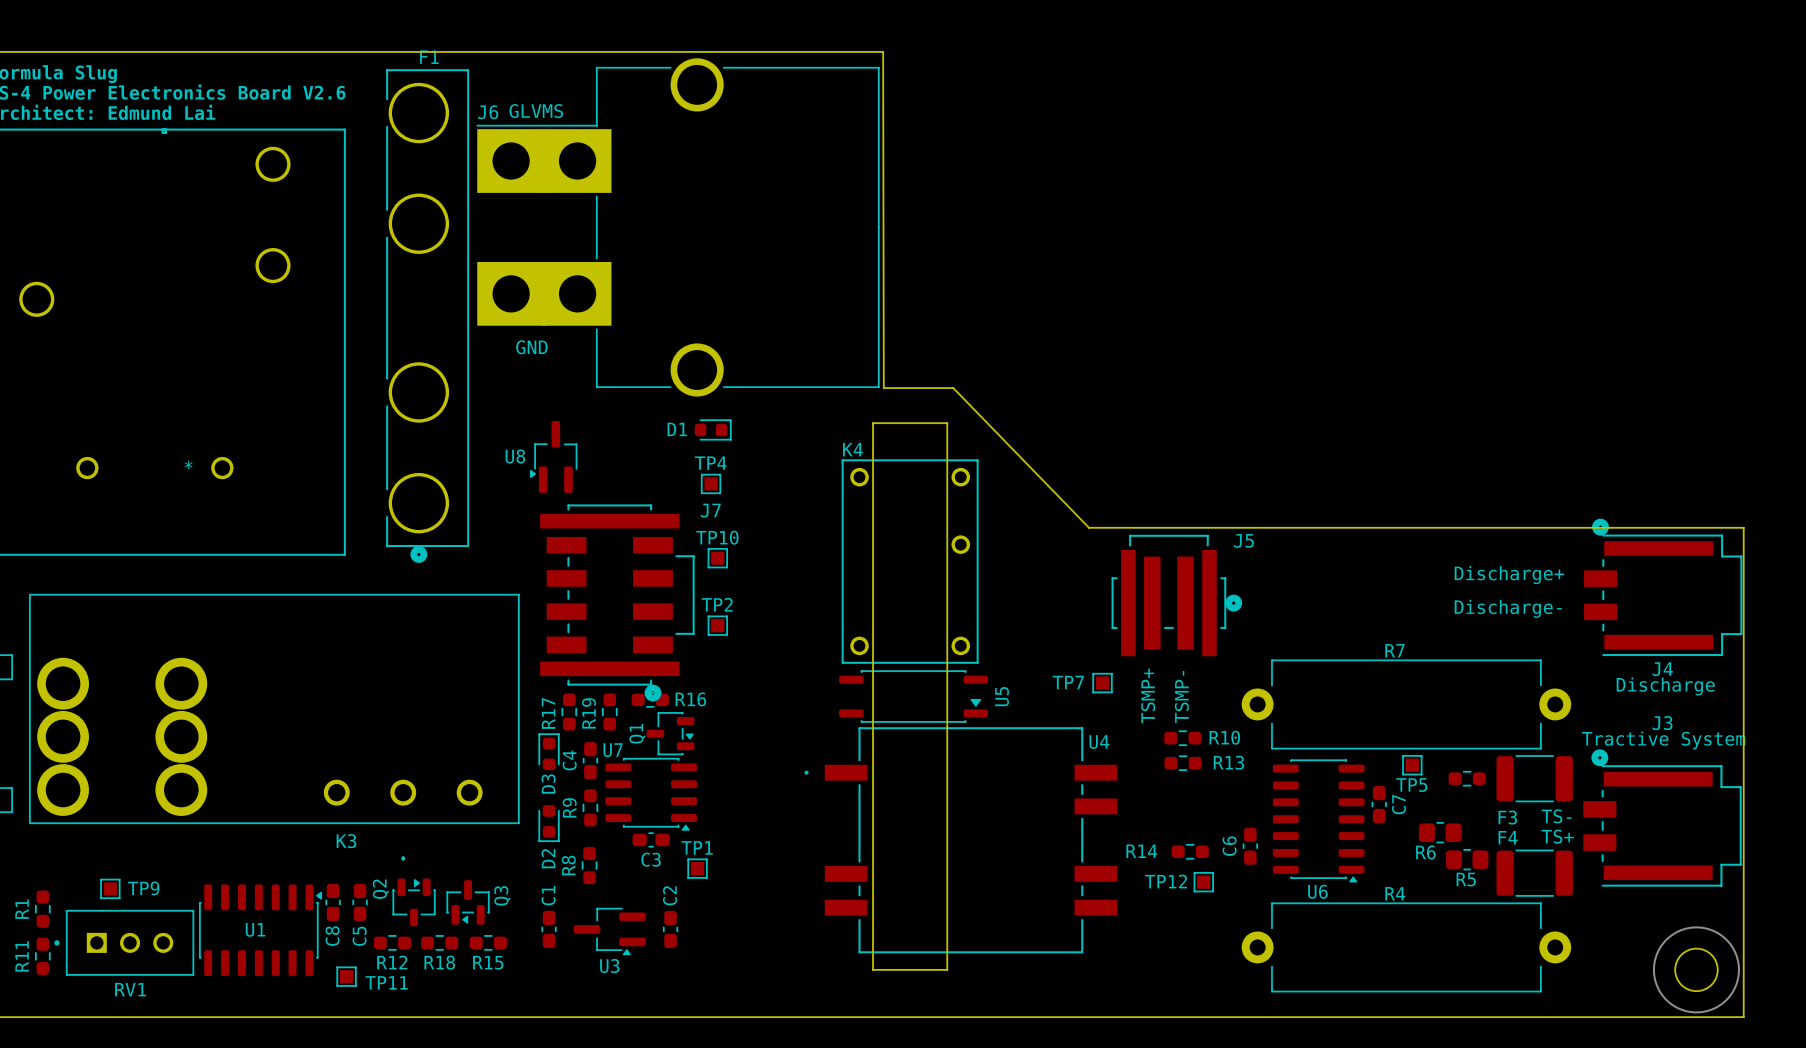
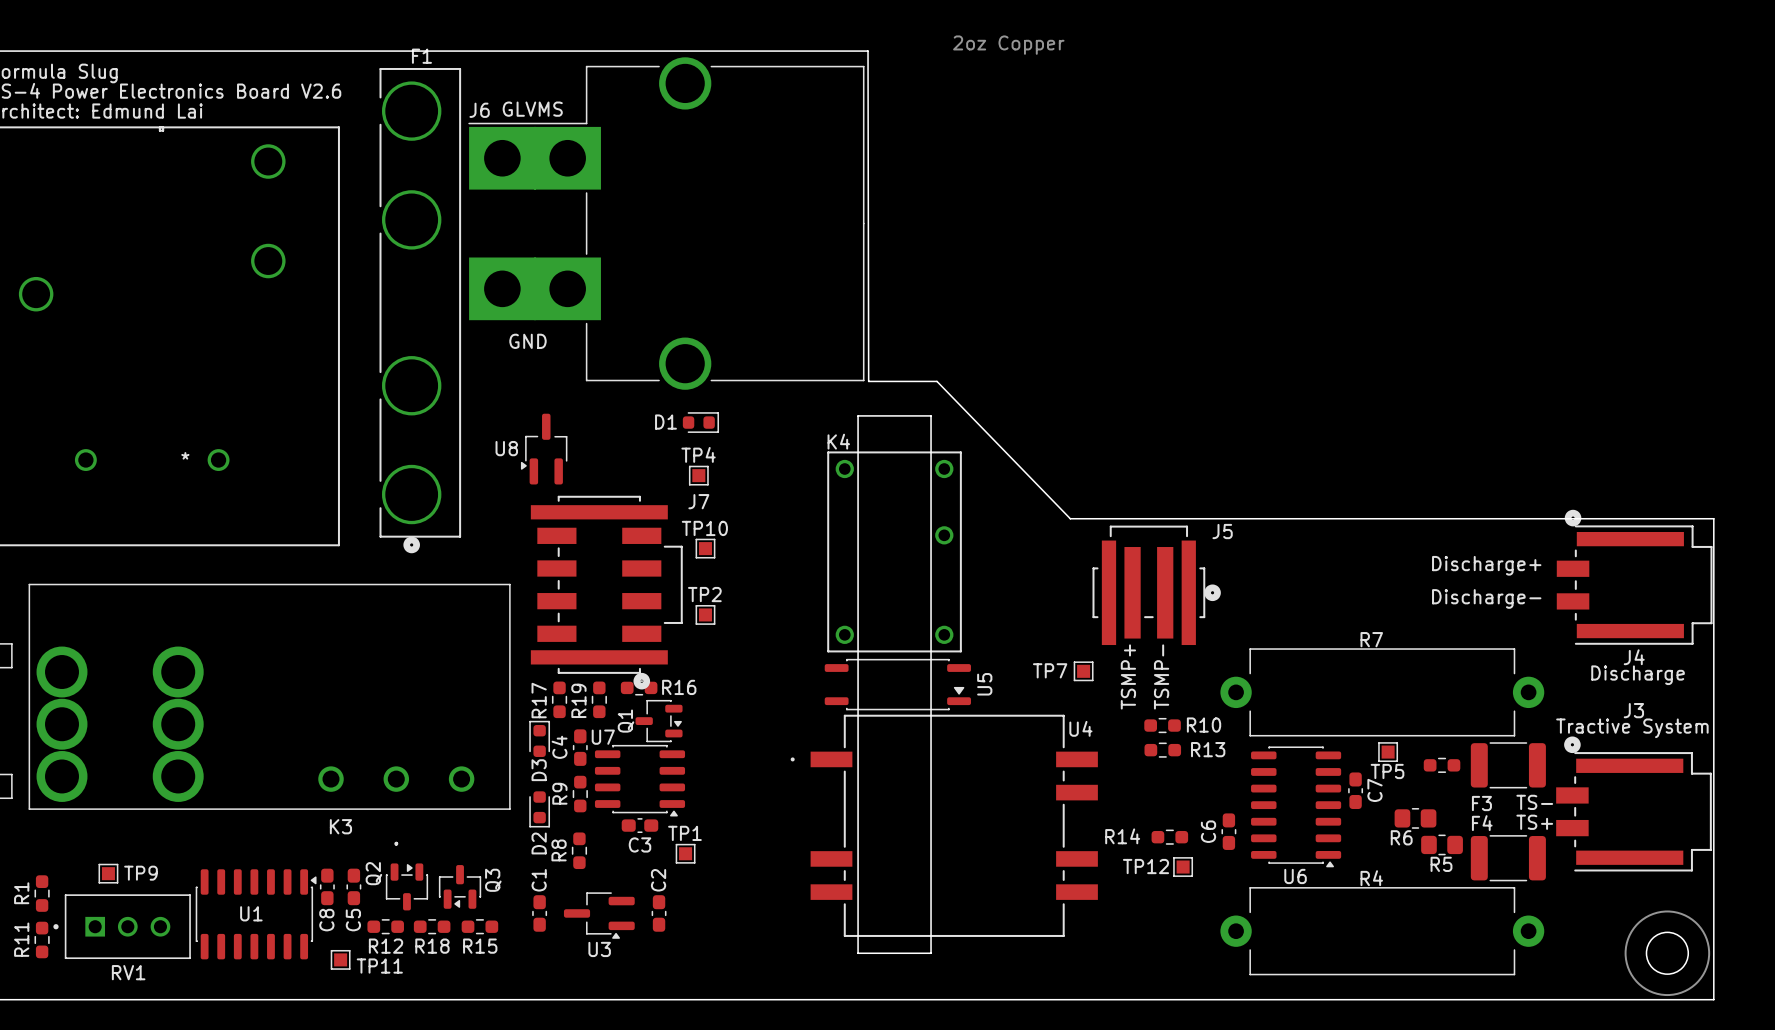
text: none -> 2oz Copper (1008, 45)

